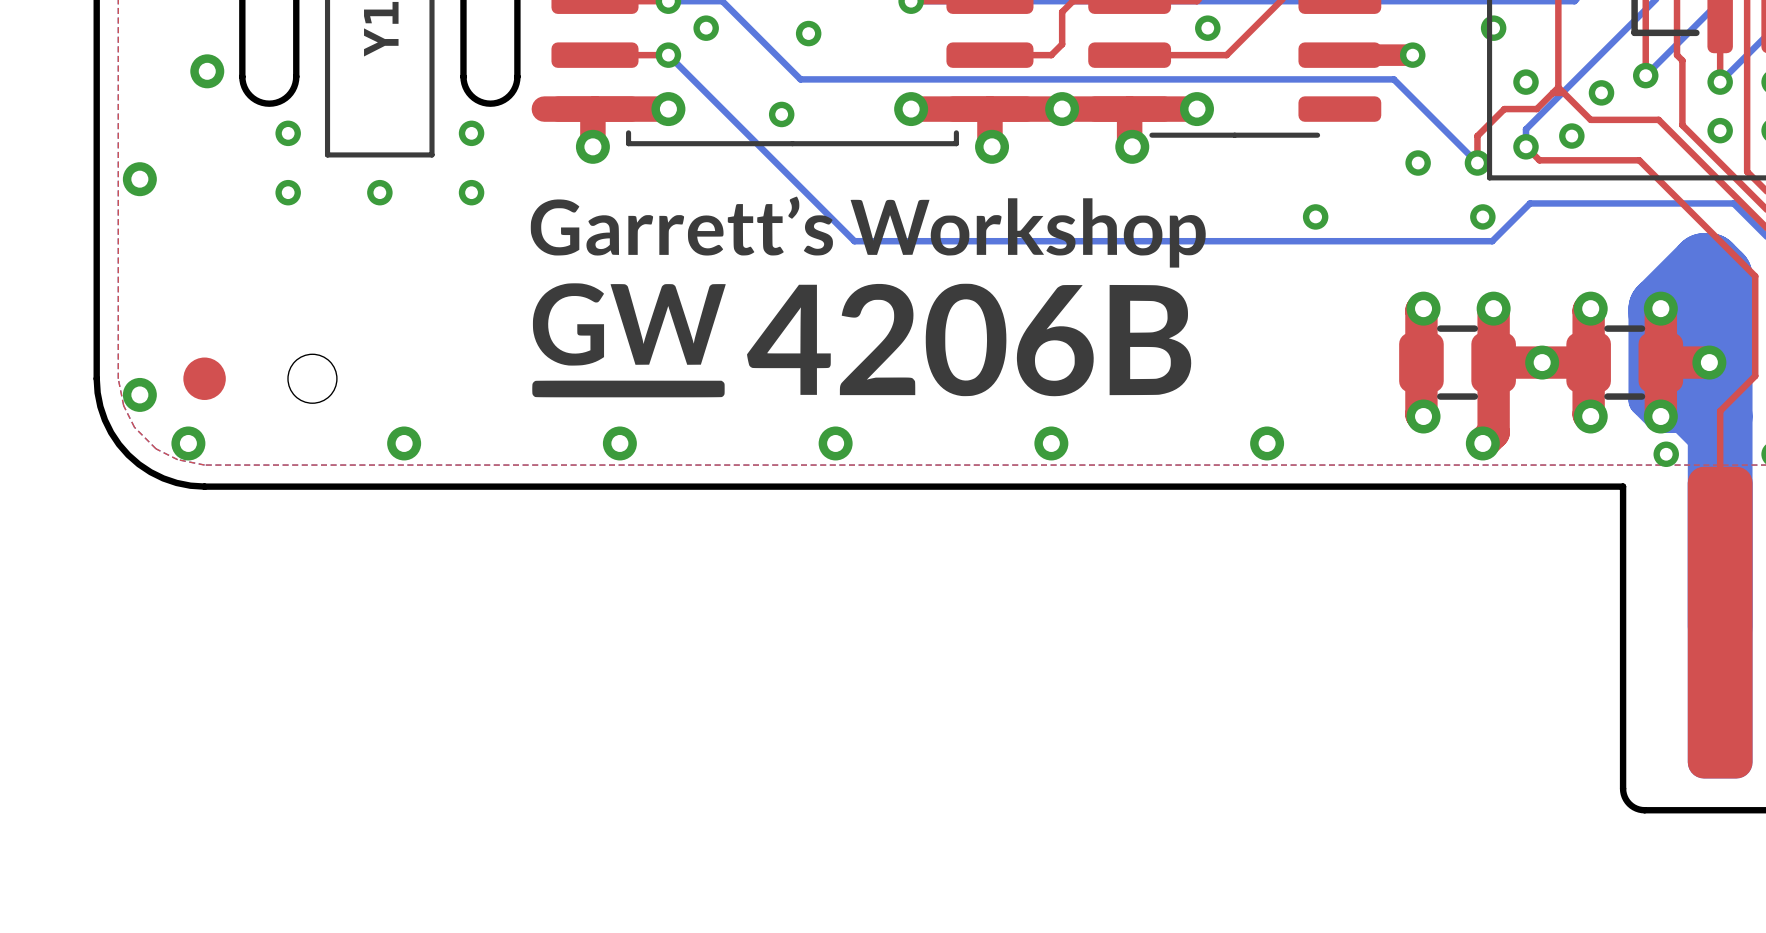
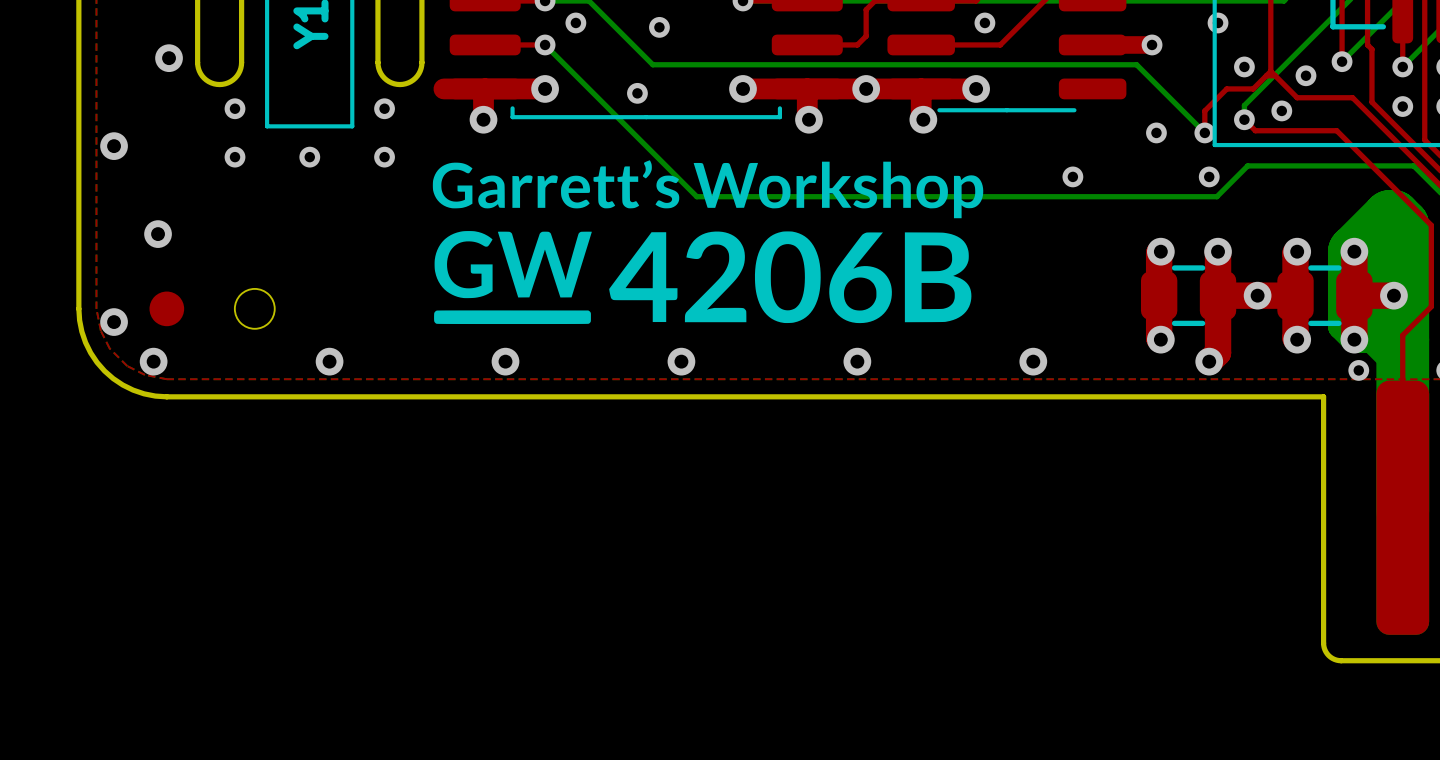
via: none -> (158, 234)

